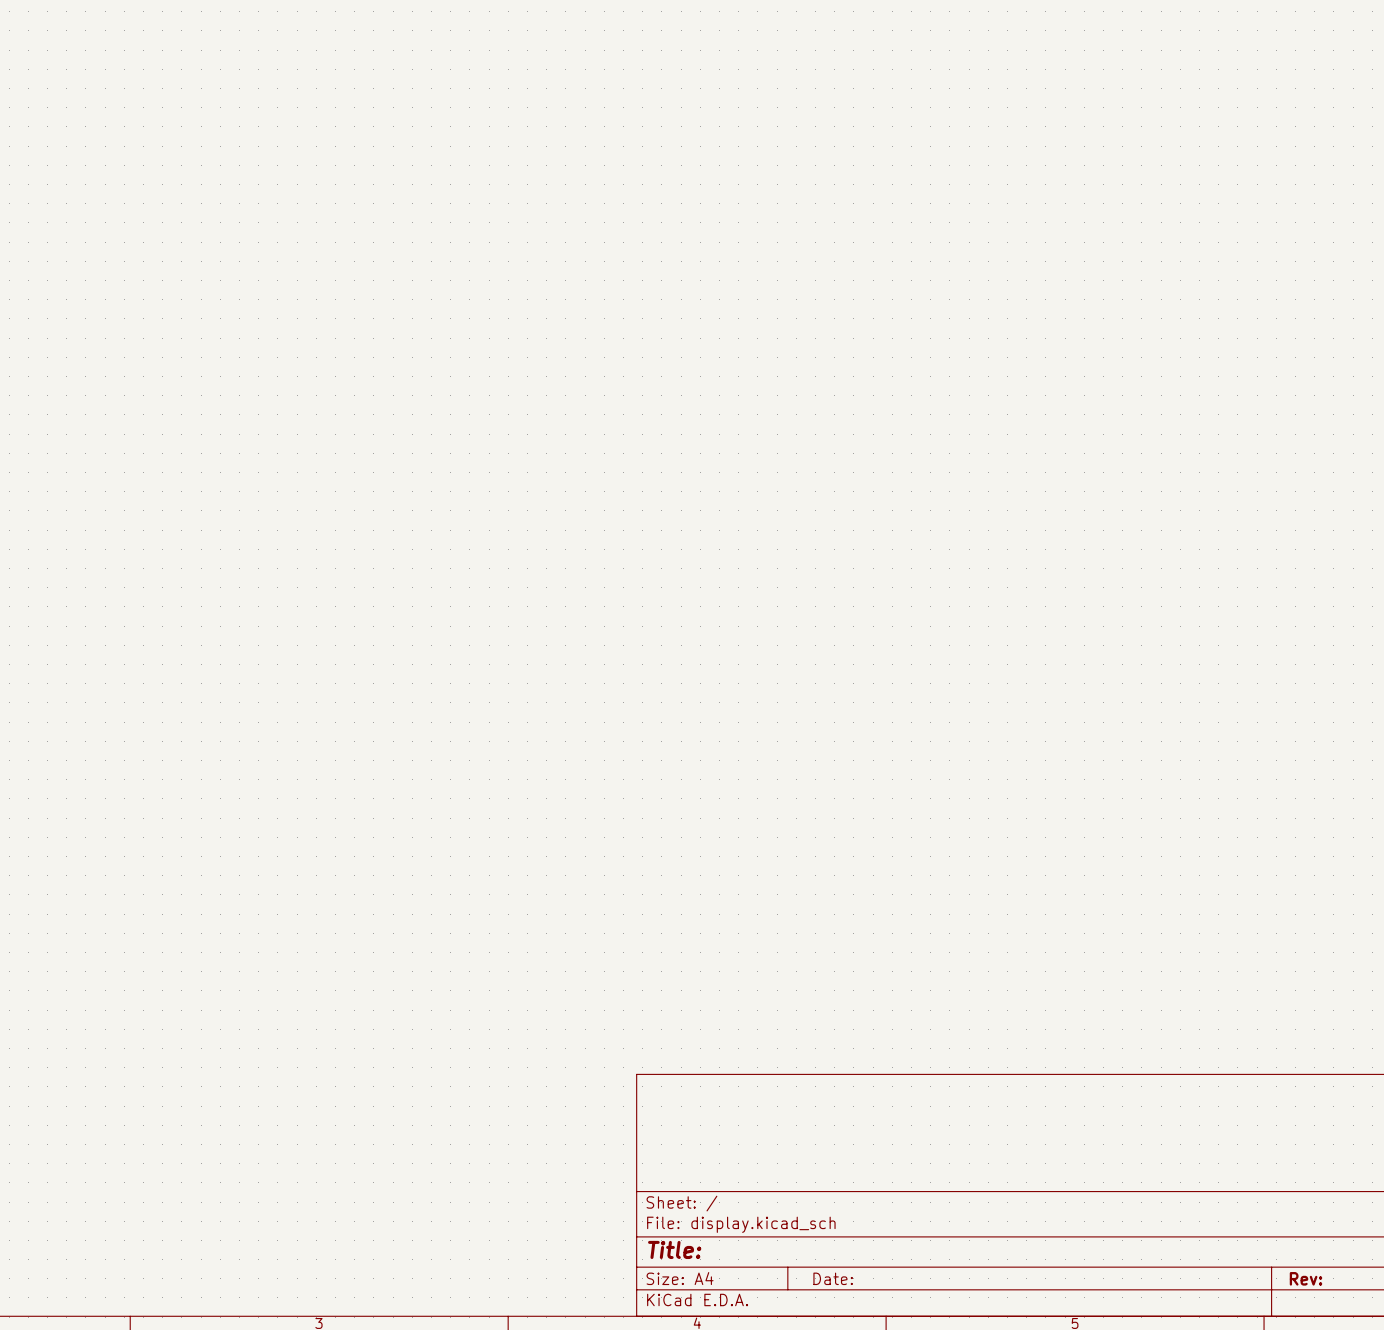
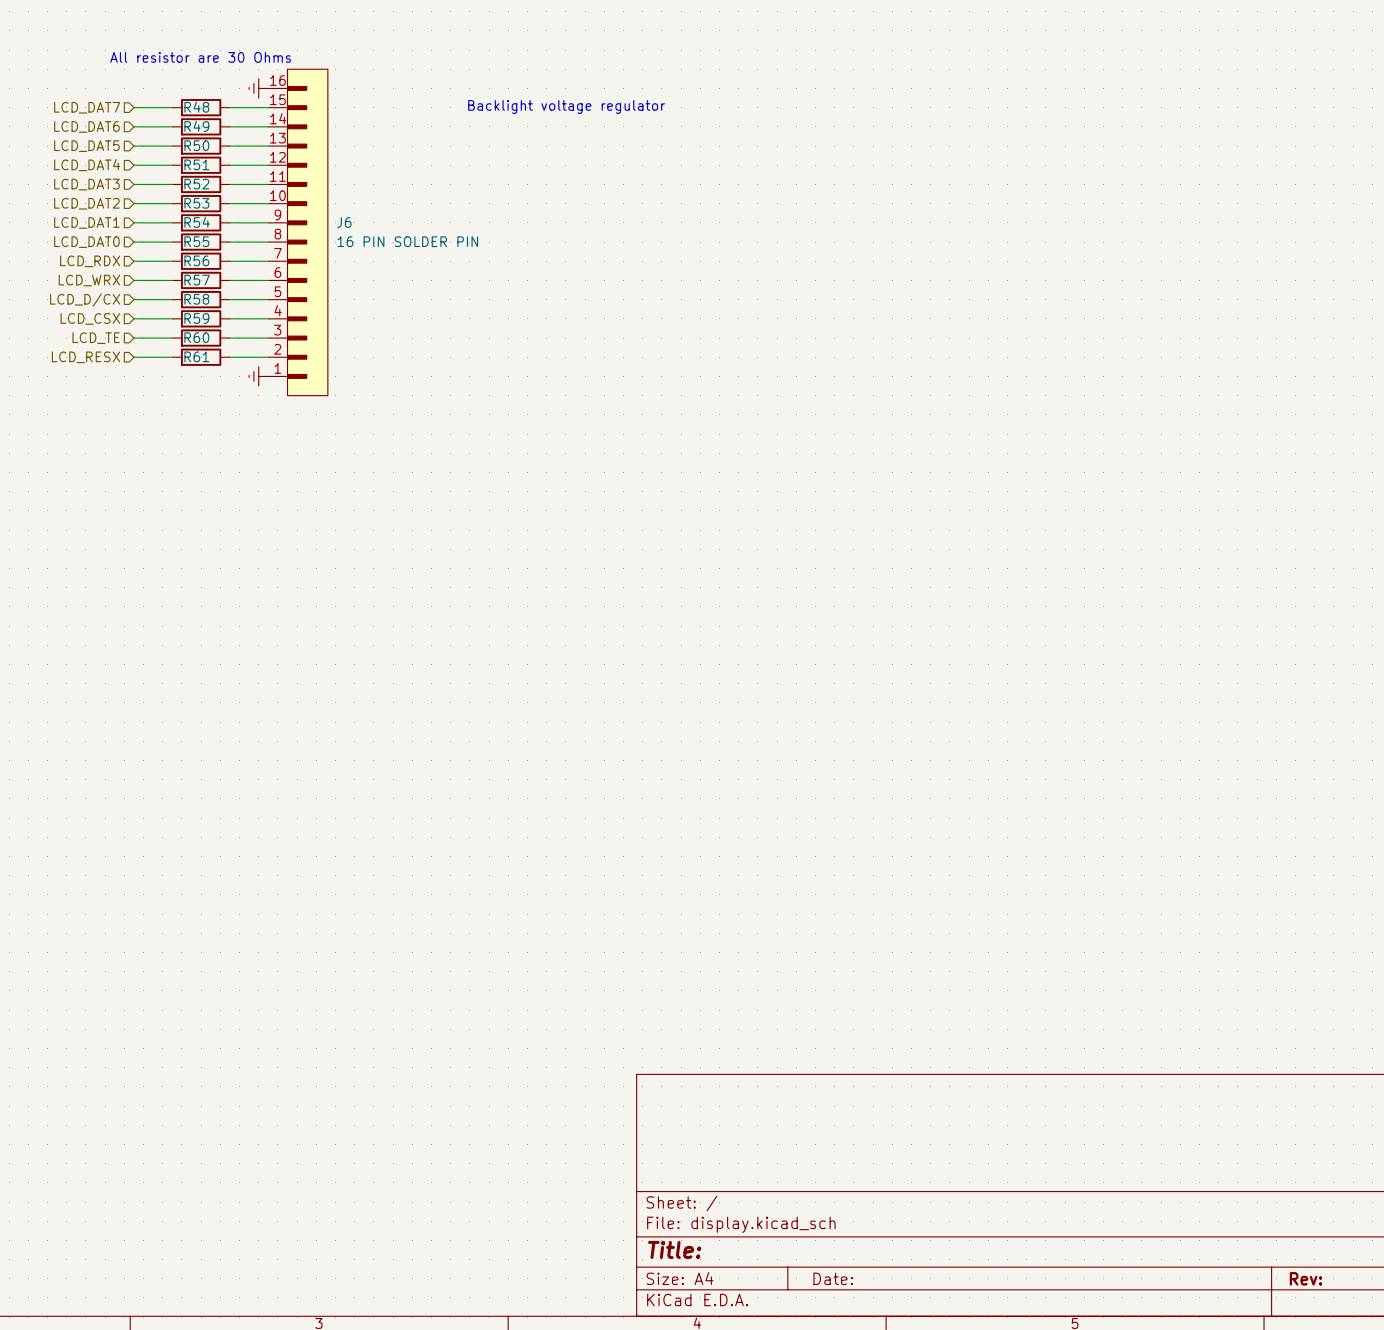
text: none -> All resistor are 30 Ohms (200, 57)
power symbol: none -> (258, 88)
hierarchical label: none -> LCD_DAT7 (87, 107)
wire: none -> (133, 107) (172, 107)
R48: none -> (201, 107)
wire: none -> (229, 107) (268, 107)
text: none -> Backlight voltage regulator (566, 107)
hierarchical label: none -> LCD_DAT6 (86, 126)
wire: none -> (133, 126) (172, 126)
R49: none -> (201, 126)
wire: none -> (229, 126) (268, 126)
hierarchical label: none -> LCD_DAT5 (86, 146)
wire: none -> (133, 146) (172, 146)
R50: none -> (201, 146)
wire: none -> (229, 146) (268, 146)
hierarchical label: none -> LCD_DAT4 (87, 165)
wire: none -> (133, 165) (172, 165)
R51: none -> (201, 165)
wire: none -> (229, 165) (268, 165)
hierarchical label: none -> LCD_DAT3 (86, 184)
wire: none -> (133, 184) (172, 184)
R52: none -> (201, 184)
wire: none -> (229, 184) (268, 184)
hierarchical label: none -> LCD_DAT2 (86, 203)
wire: none -> (133, 203) (172, 203)
R53: none -> (201, 203)
wire: none -> (229, 203) (268, 203)
hierarchical label: none -> LCD_DAT1 (86, 222)
wire: none -> (133, 222) (172, 222)
R54: none -> (201, 222)
wire: none -> (229, 222) (268, 222)
J6: none -> 16 PIN SOLDER PIN (298, 232)
hierarchical label: none -> LCD_DAT0 (86, 242)
wire: none -> (133, 242) (172, 242)
R55: none -> (201, 242)
wire: none -> (229, 242) (268, 242)
hierarchical label: none -> LCD_RDX (90, 261)
wire: none -> (133, 261) (172, 261)
R56: none -> (201, 261)
wire: none -> (229, 261) (268, 261)
hierarchical label: none -> LCD_WRX (89, 280)
wire: none -> (133, 280) (172, 280)
R57: none -> (201, 280)
wire: none -> (229, 280) (268, 280)
wire: none -> (133, 299) (172, 299)
R58: none -> (201, 299)
wire: none -> (229, 299) (268, 299)
hierarchical label: none -> LCD_D/CX (85, 300)
hierarchical label: none -> LCD_CSX (90, 318)
wire: none -> (133, 318) (172, 318)
R59: none -> (201, 318)
wire: none -> (229, 318) (268, 318)
hierarchical label: none -> LCD_TE (96, 338)
wire: none -> (133, 338) (172, 338)
R60: none -> (201, 338)
wire: none -> (229, 338) (268, 338)
hierarchical label: none -> LCD_RESX (86, 357)
wire: none -> (133, 357) (172, 357)
R61: none -> (201, 357)
wire: none -> (229, 357) (268, 357)
power symbol: none -> (258, 376)

